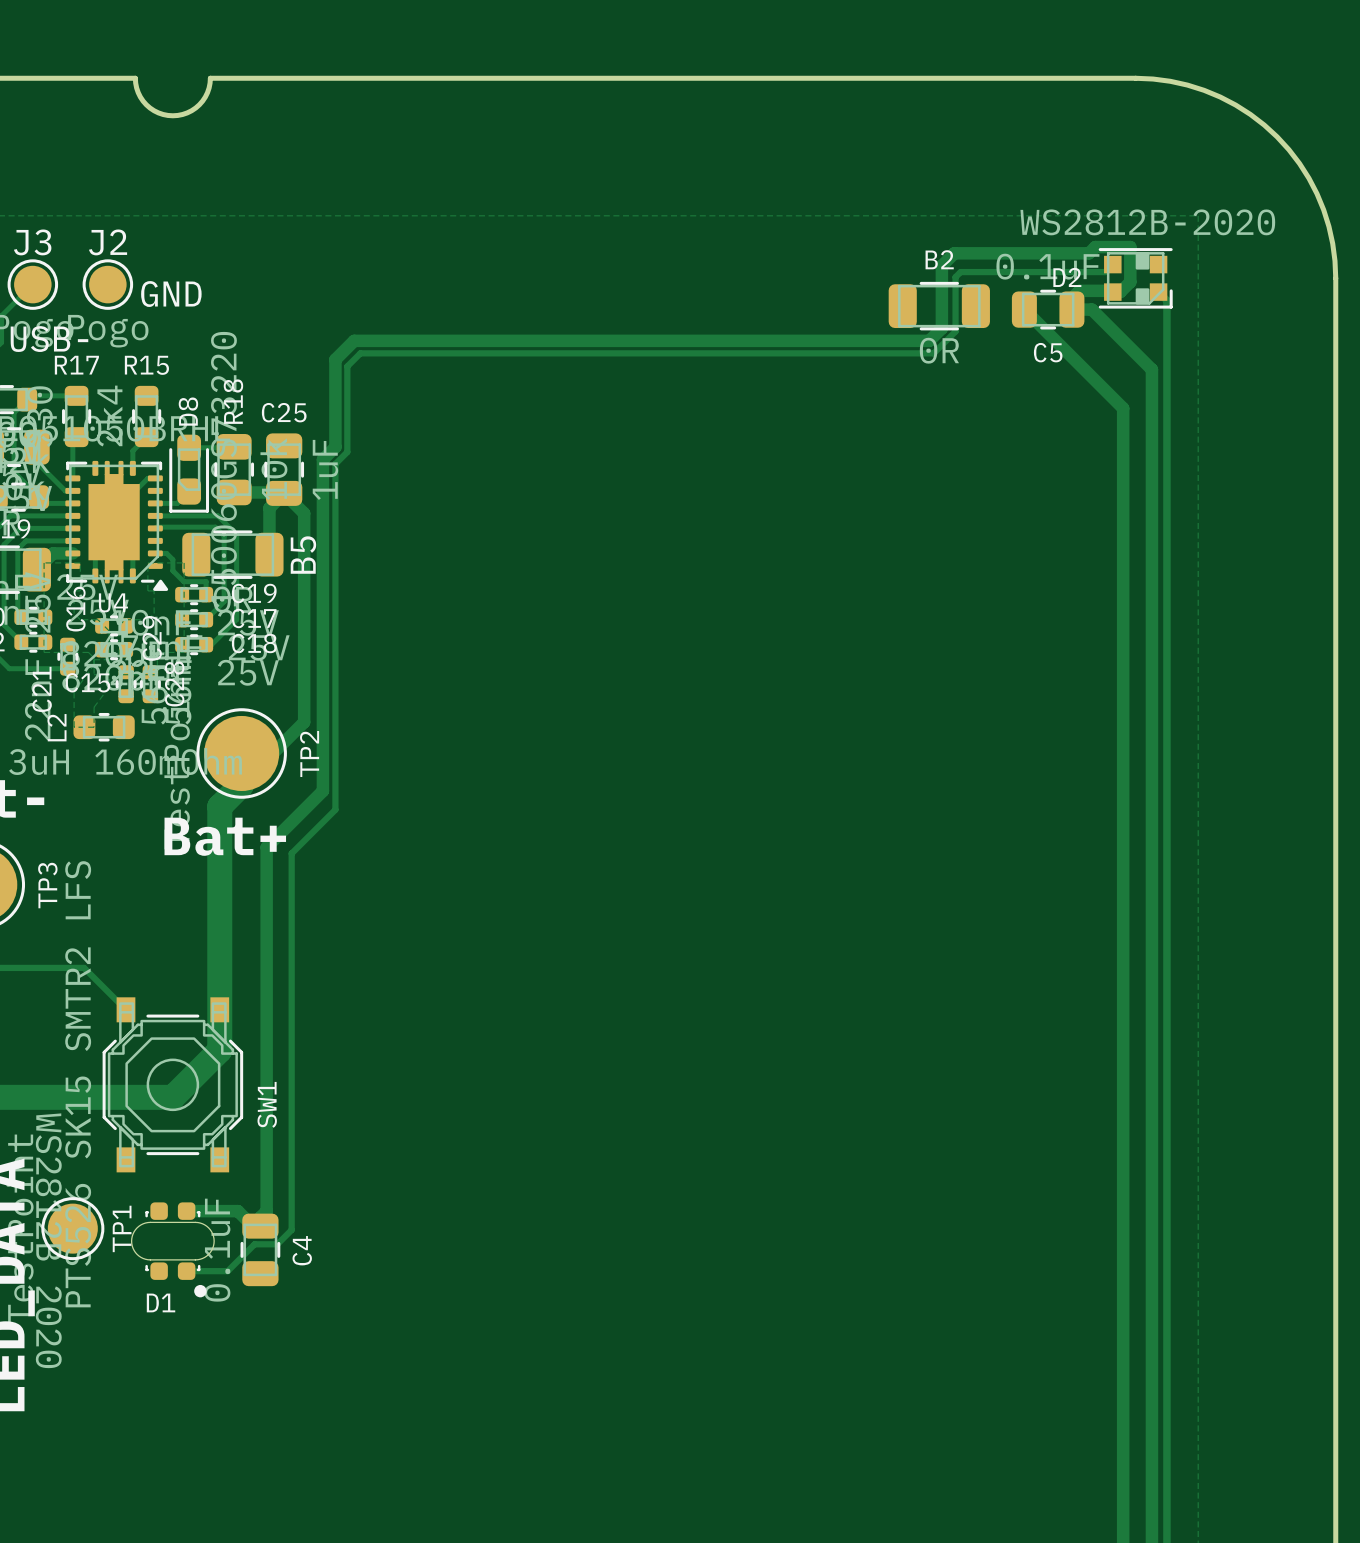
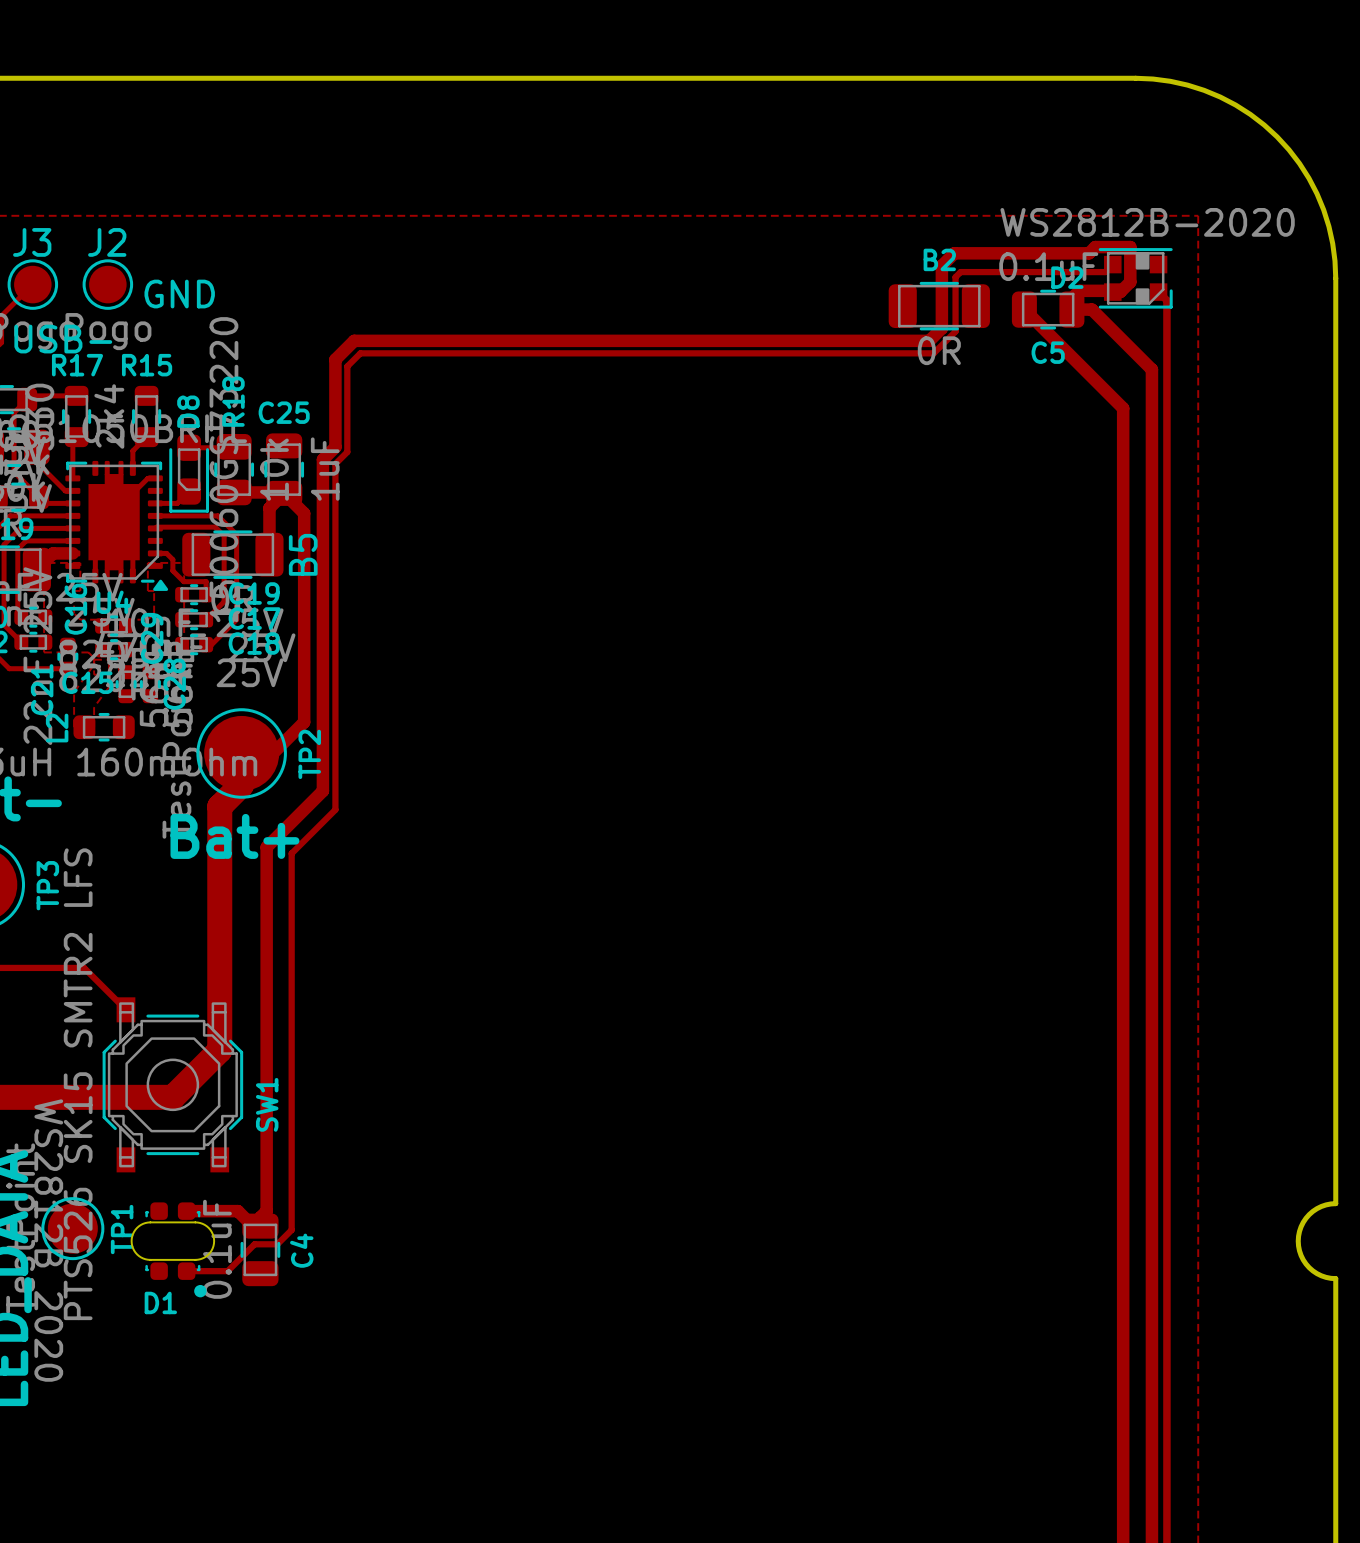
board edge: (135, 78) (138, 92) (146, 104) (158, 112) (172, 115) (187, 112) (199, 104) (207, 92) (210, 78) -> (135, 78) (210, 78)
board edge: (1335, 1203) (1335, 1278) -> (1335, 1203) (1321, 1206) (1309, 1214) (1301, 1226) (1298, 1241) (1301, 1255) (1309, 1267) (1321, 1275) (1335, 1278)

